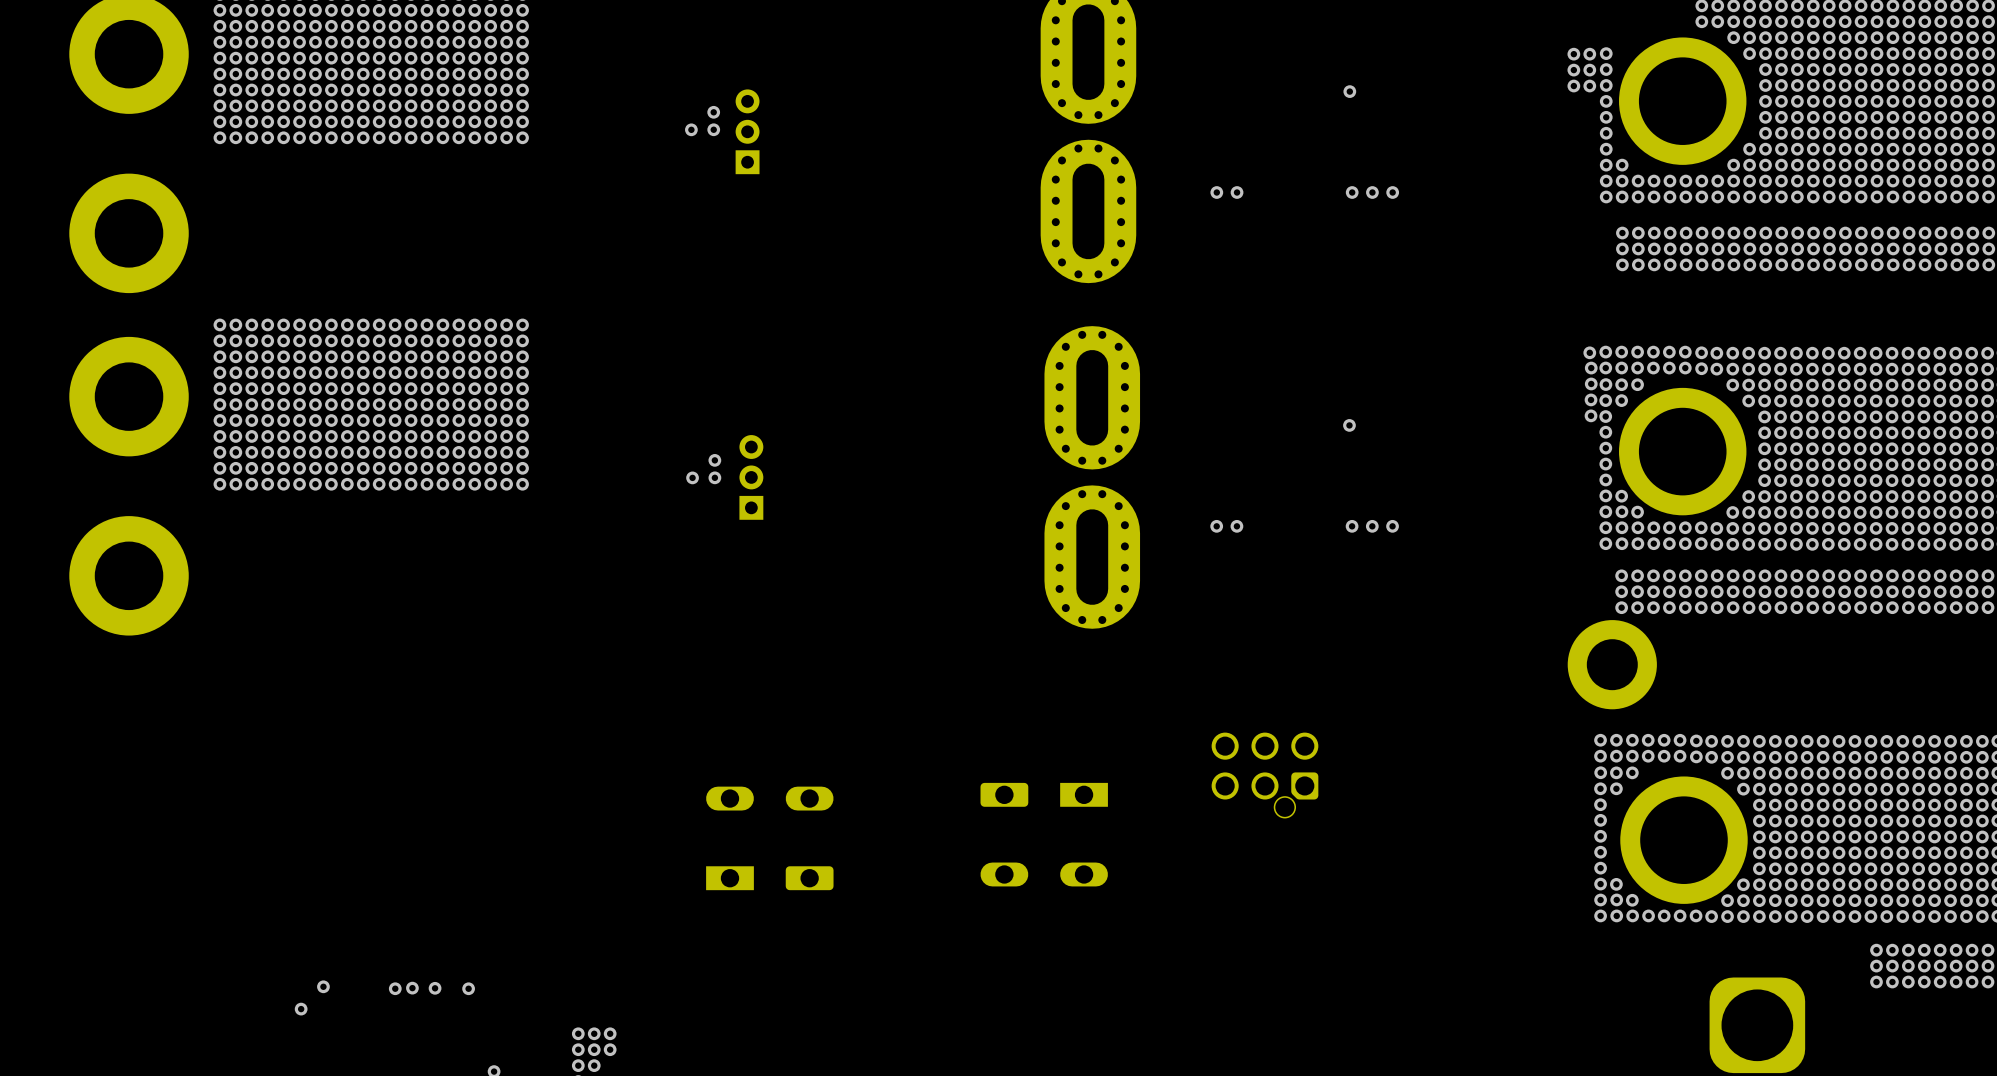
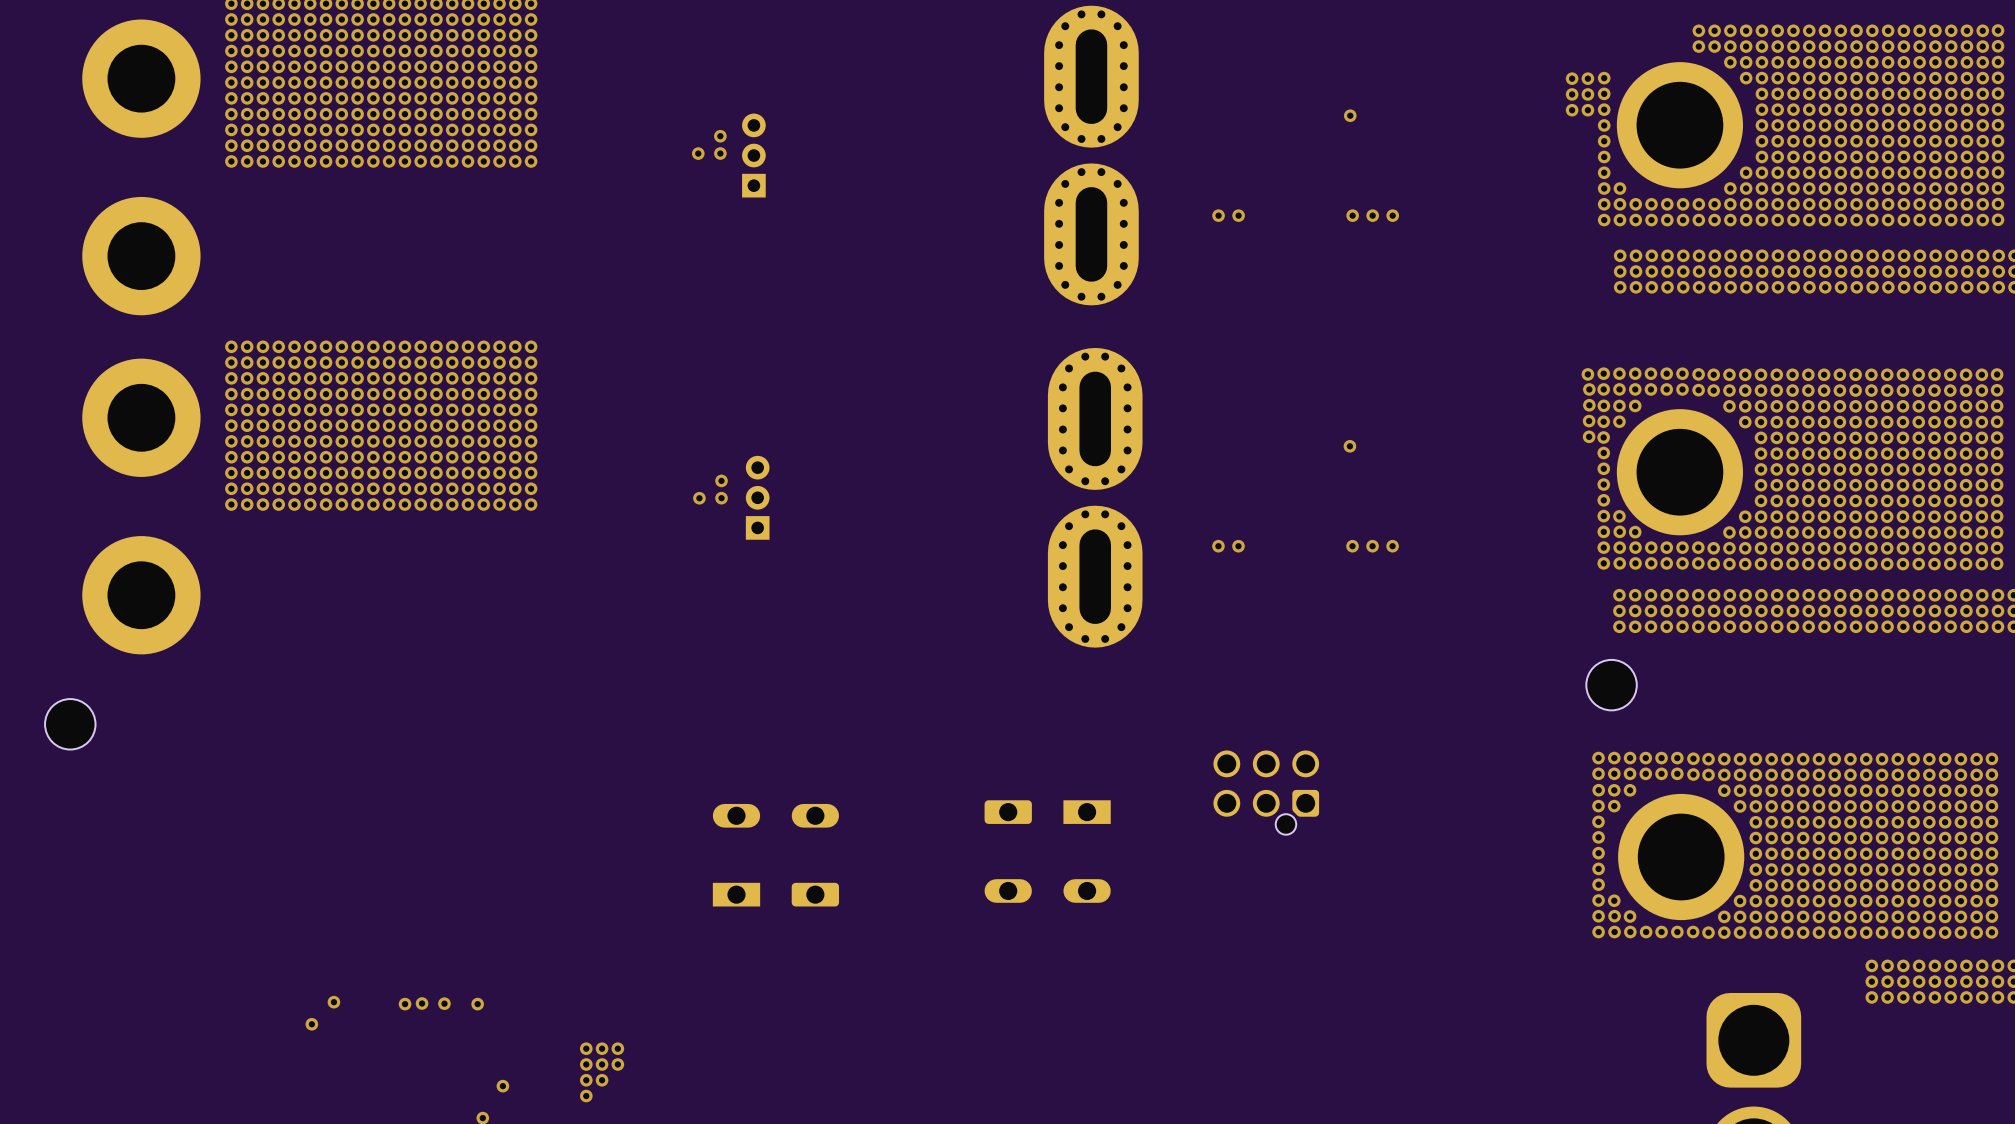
part footprint: [1567, 620, 1657, 710] -> [1586, 659, 1637, 711]
part: none -> (70, 724)

